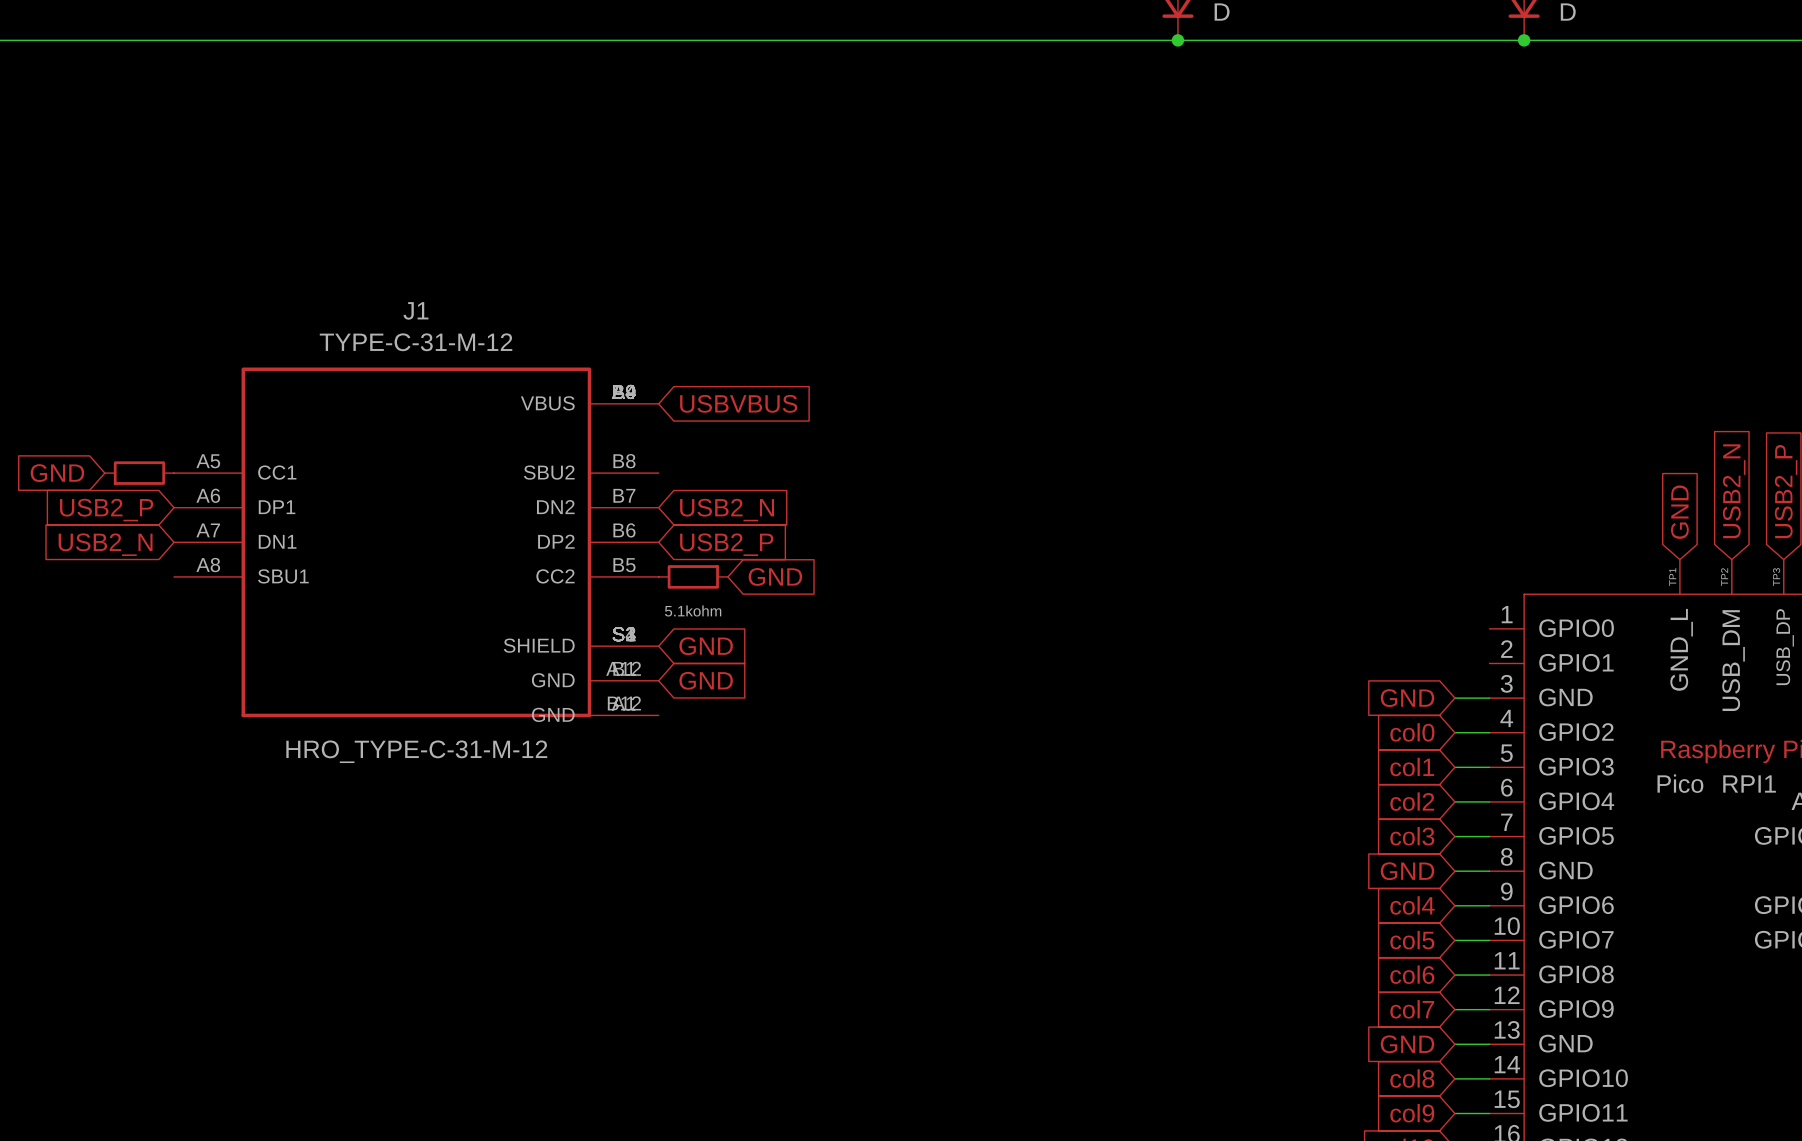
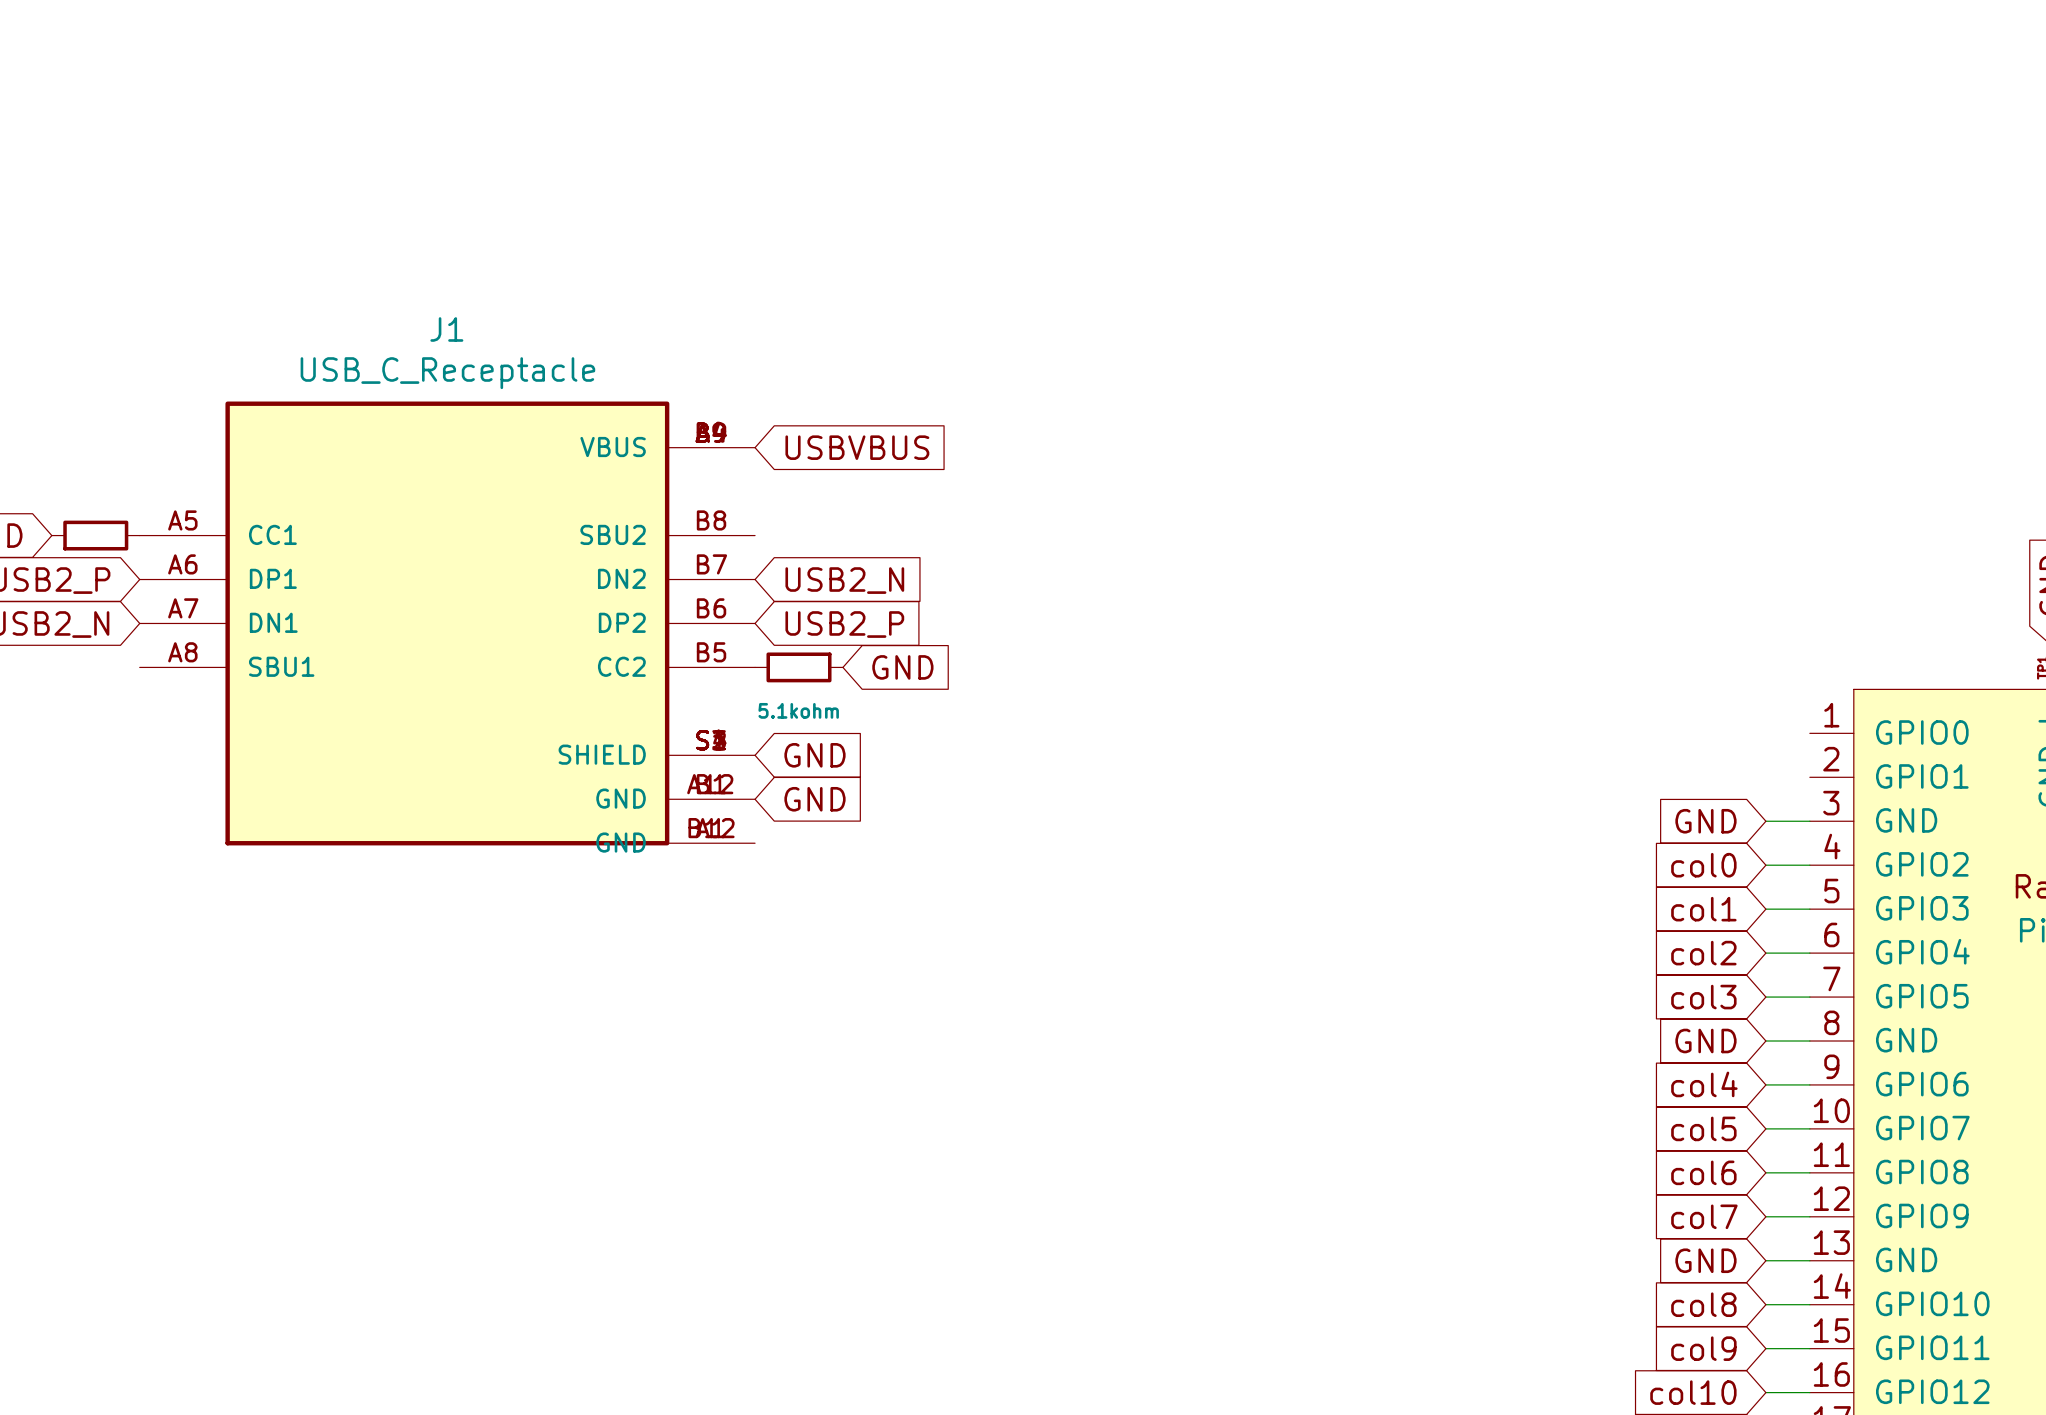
J1 value: TYPE-C-31-M-12 (416, 342) -> USB_C_Receptacle (447, 373)
J1 text: HRO_TYPE-C-31-M-12 (416, 751) -> none

